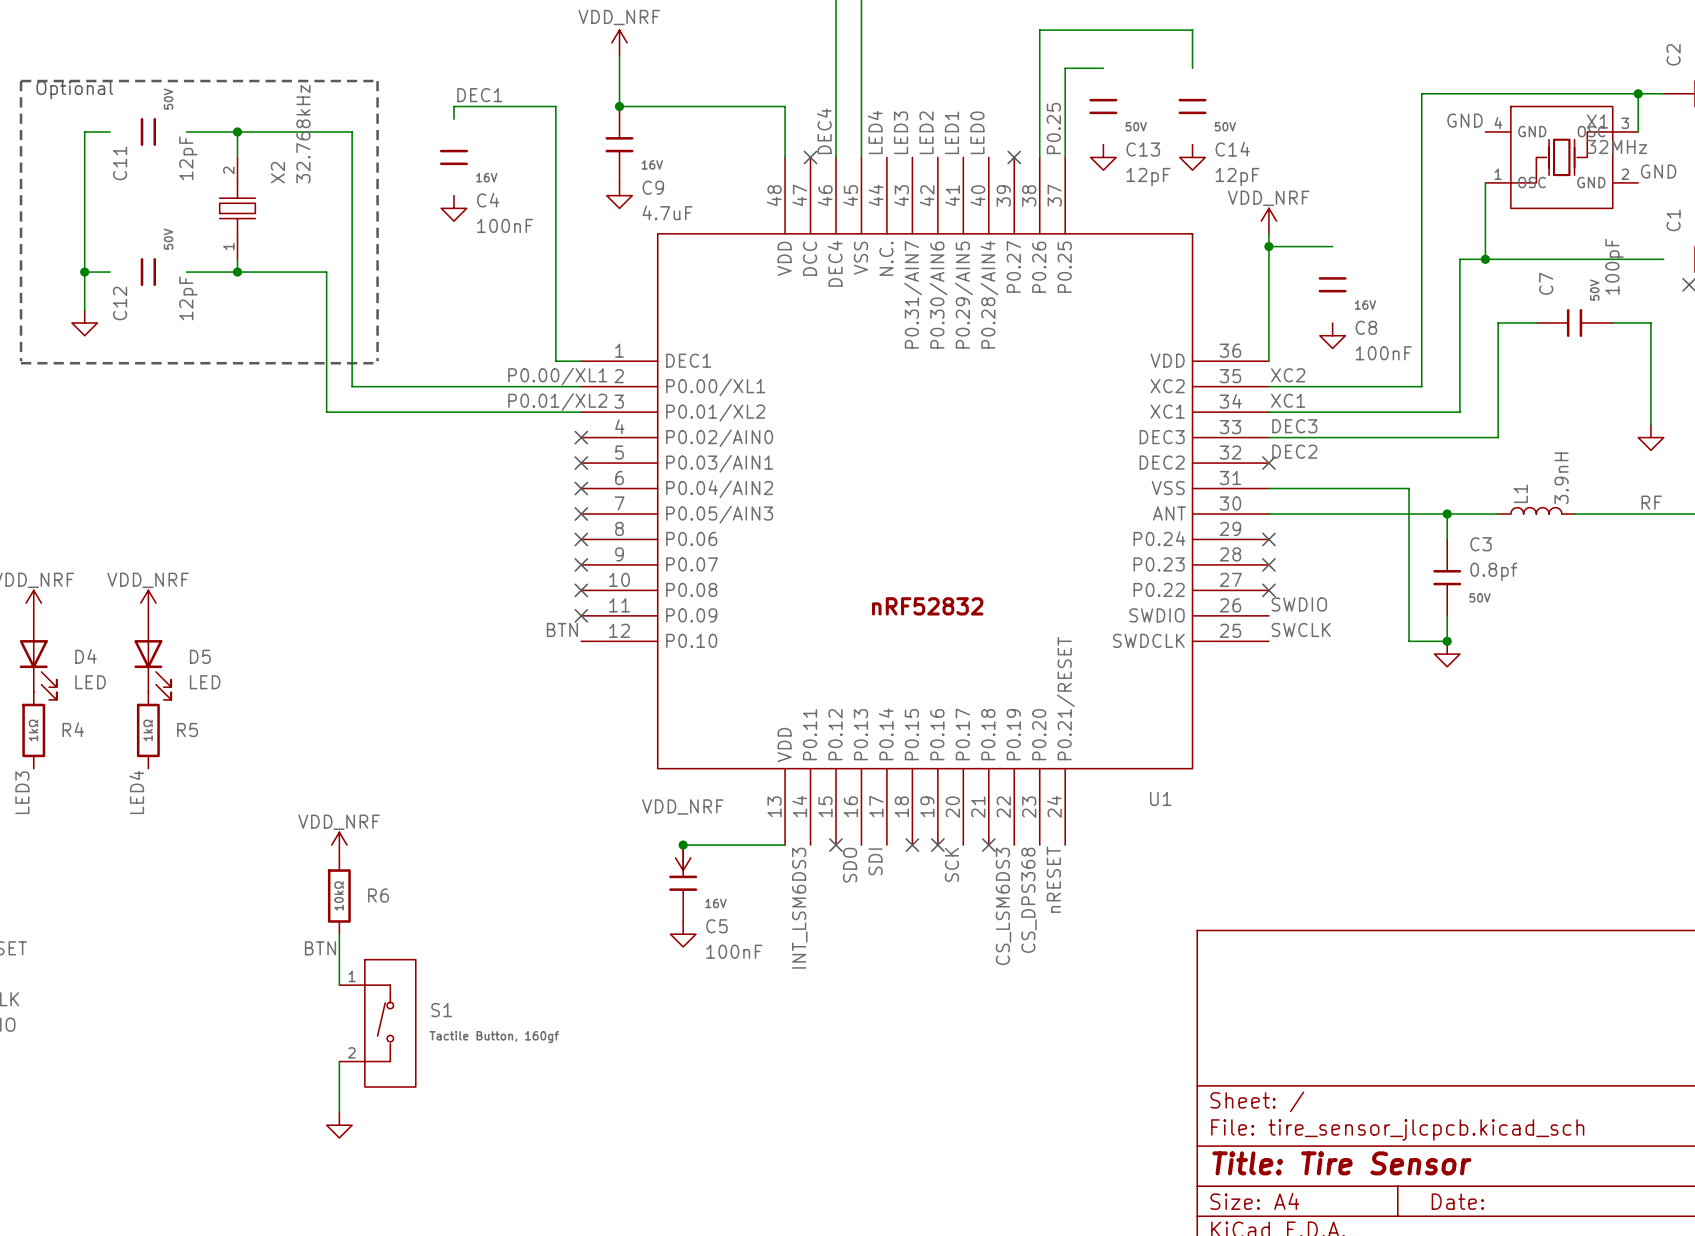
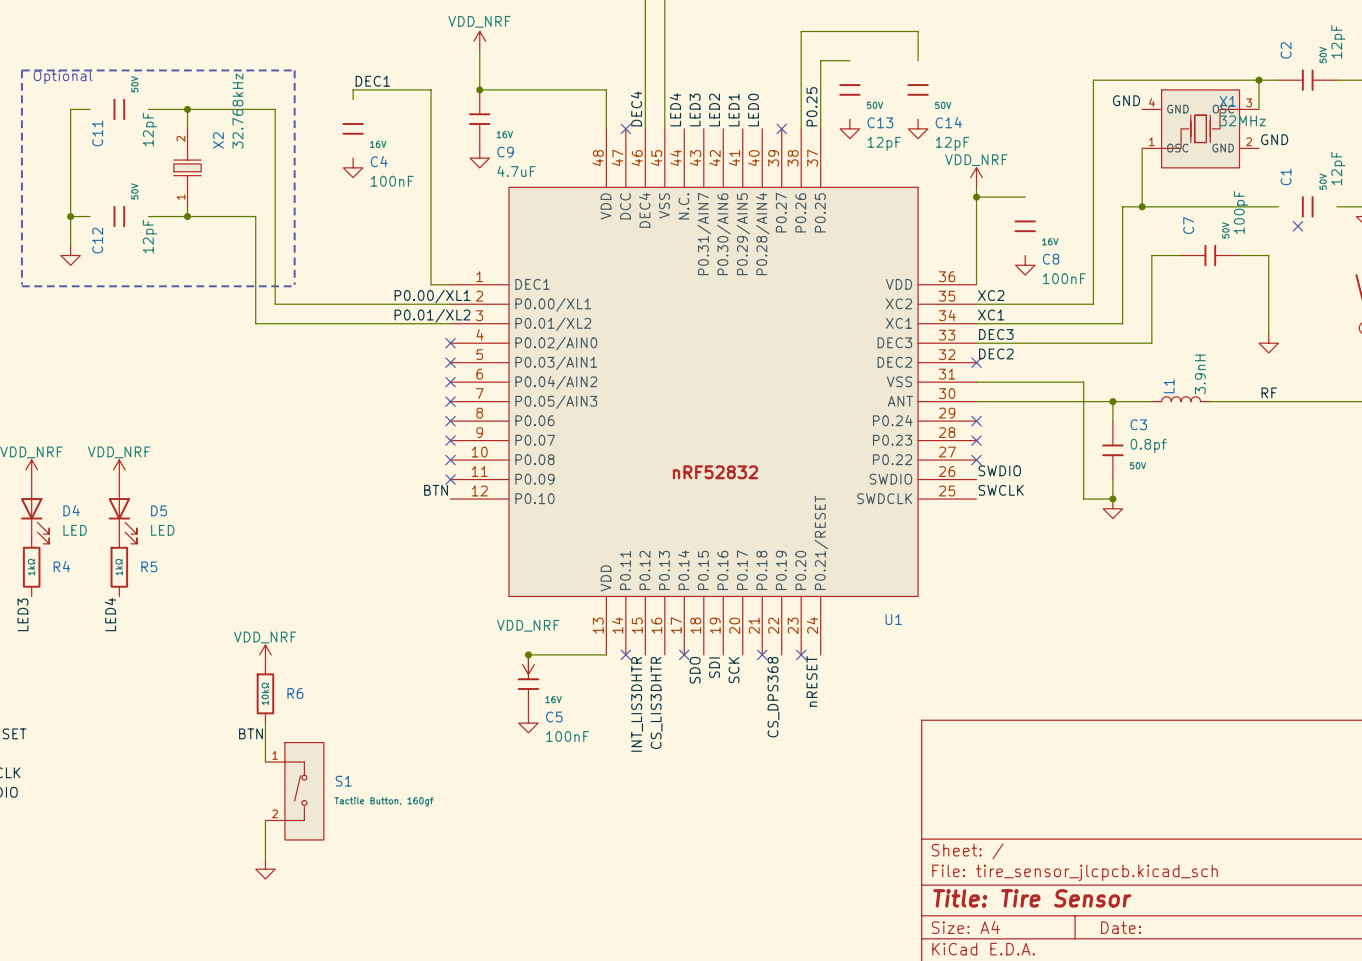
no-connect mark: none -> (625, 654)
no-connect mark: (835, 845) -> none
no-connect mark: none -> (684, 654)
no-connect mark: (912, 845) -> none
no-connect mark: (937, 845) -> none
no-connect mark: none -> (801, 654)
label position: SDI (875, 861) -> SDI (714, 667)
label: SDO (850, 865) -> CS_LIS3DHTR (656, 702)
label: none -> SDO (695, 670)
label: CS_DPS368 (1028, 900) -> none
label: CS_LSM6DS3 (1003, 906) -> CS_DPS368 (773, 697)
label: INT_LSM6DS3 (799, 908) -> INT_LIS3DHTR (637, 704)

